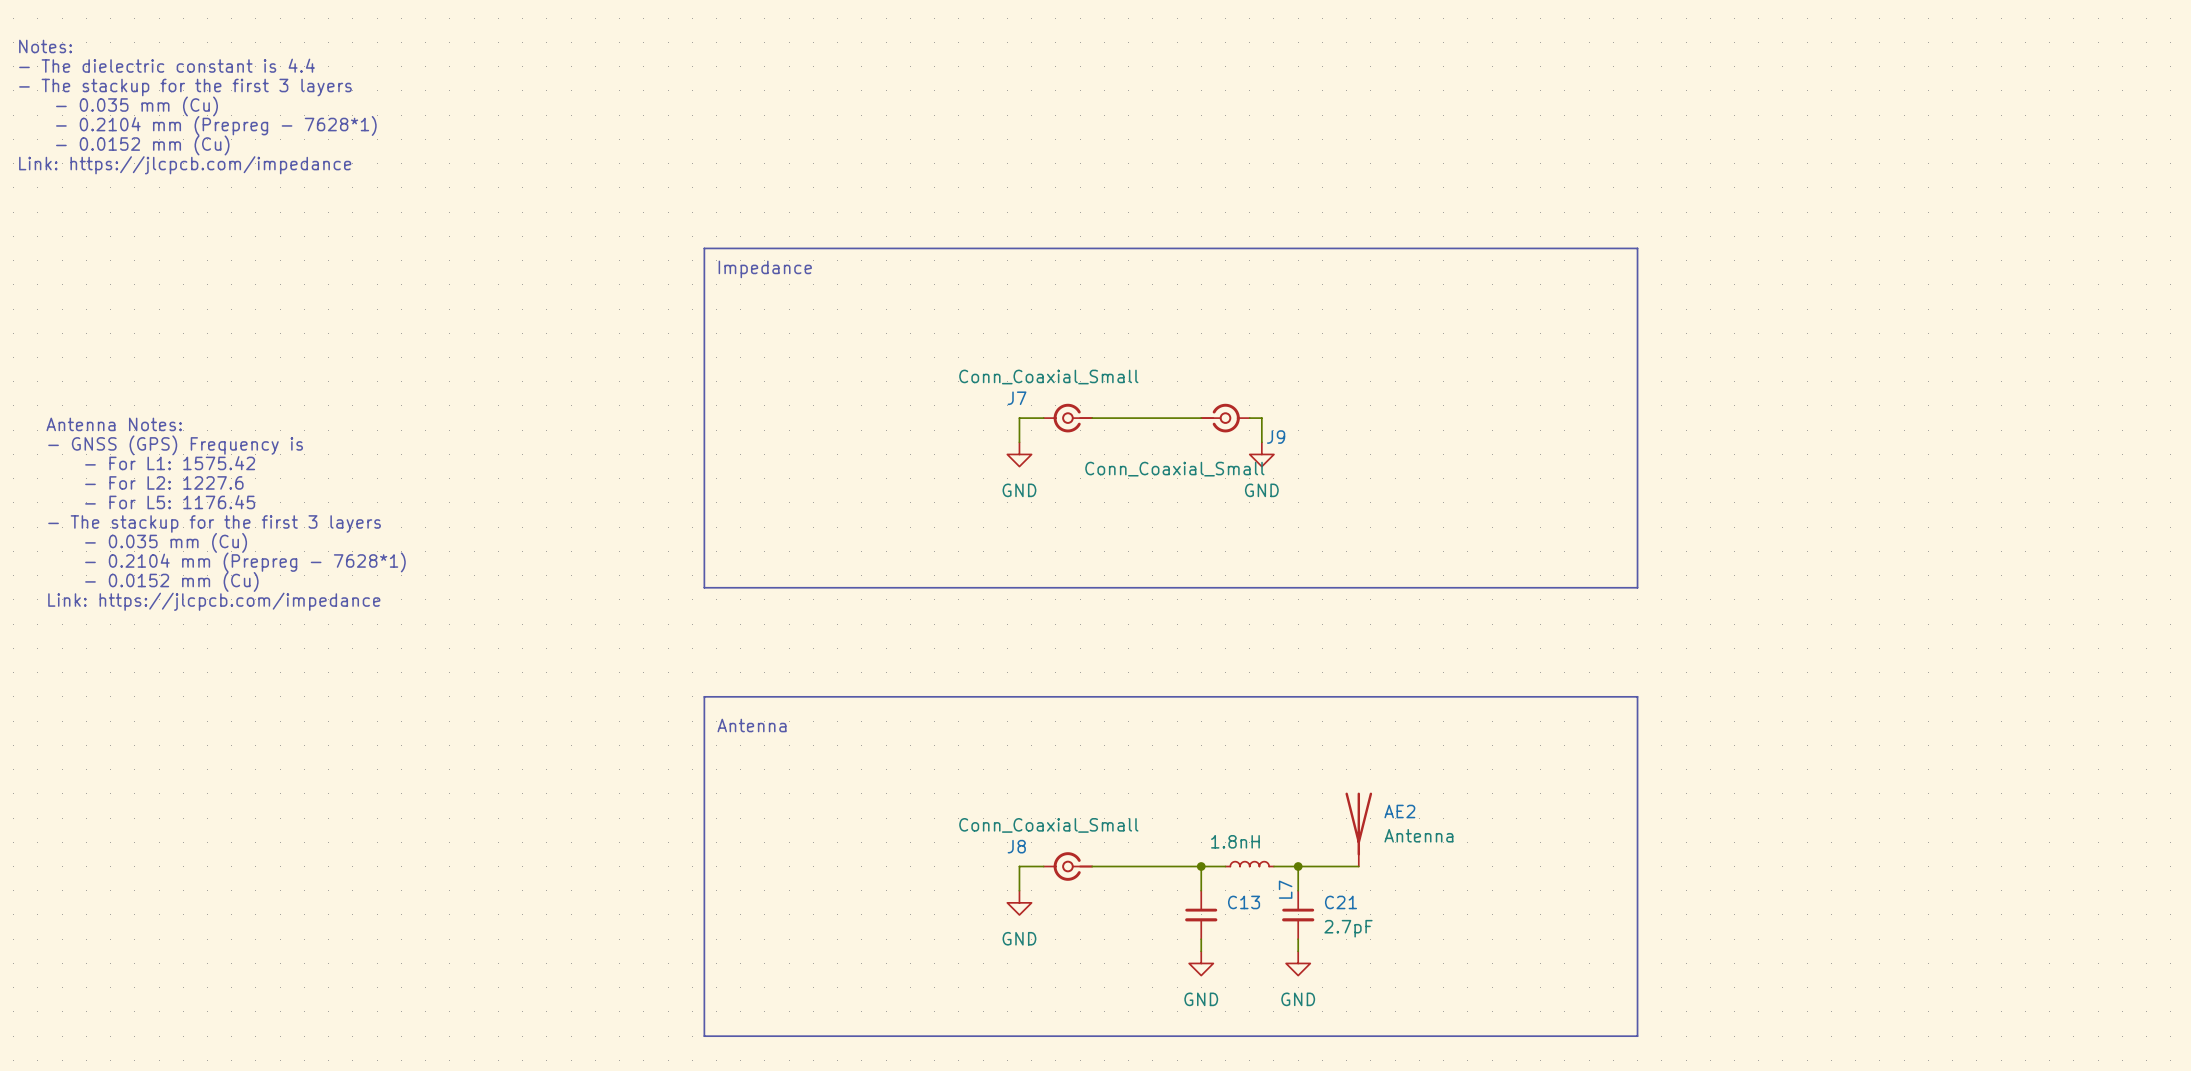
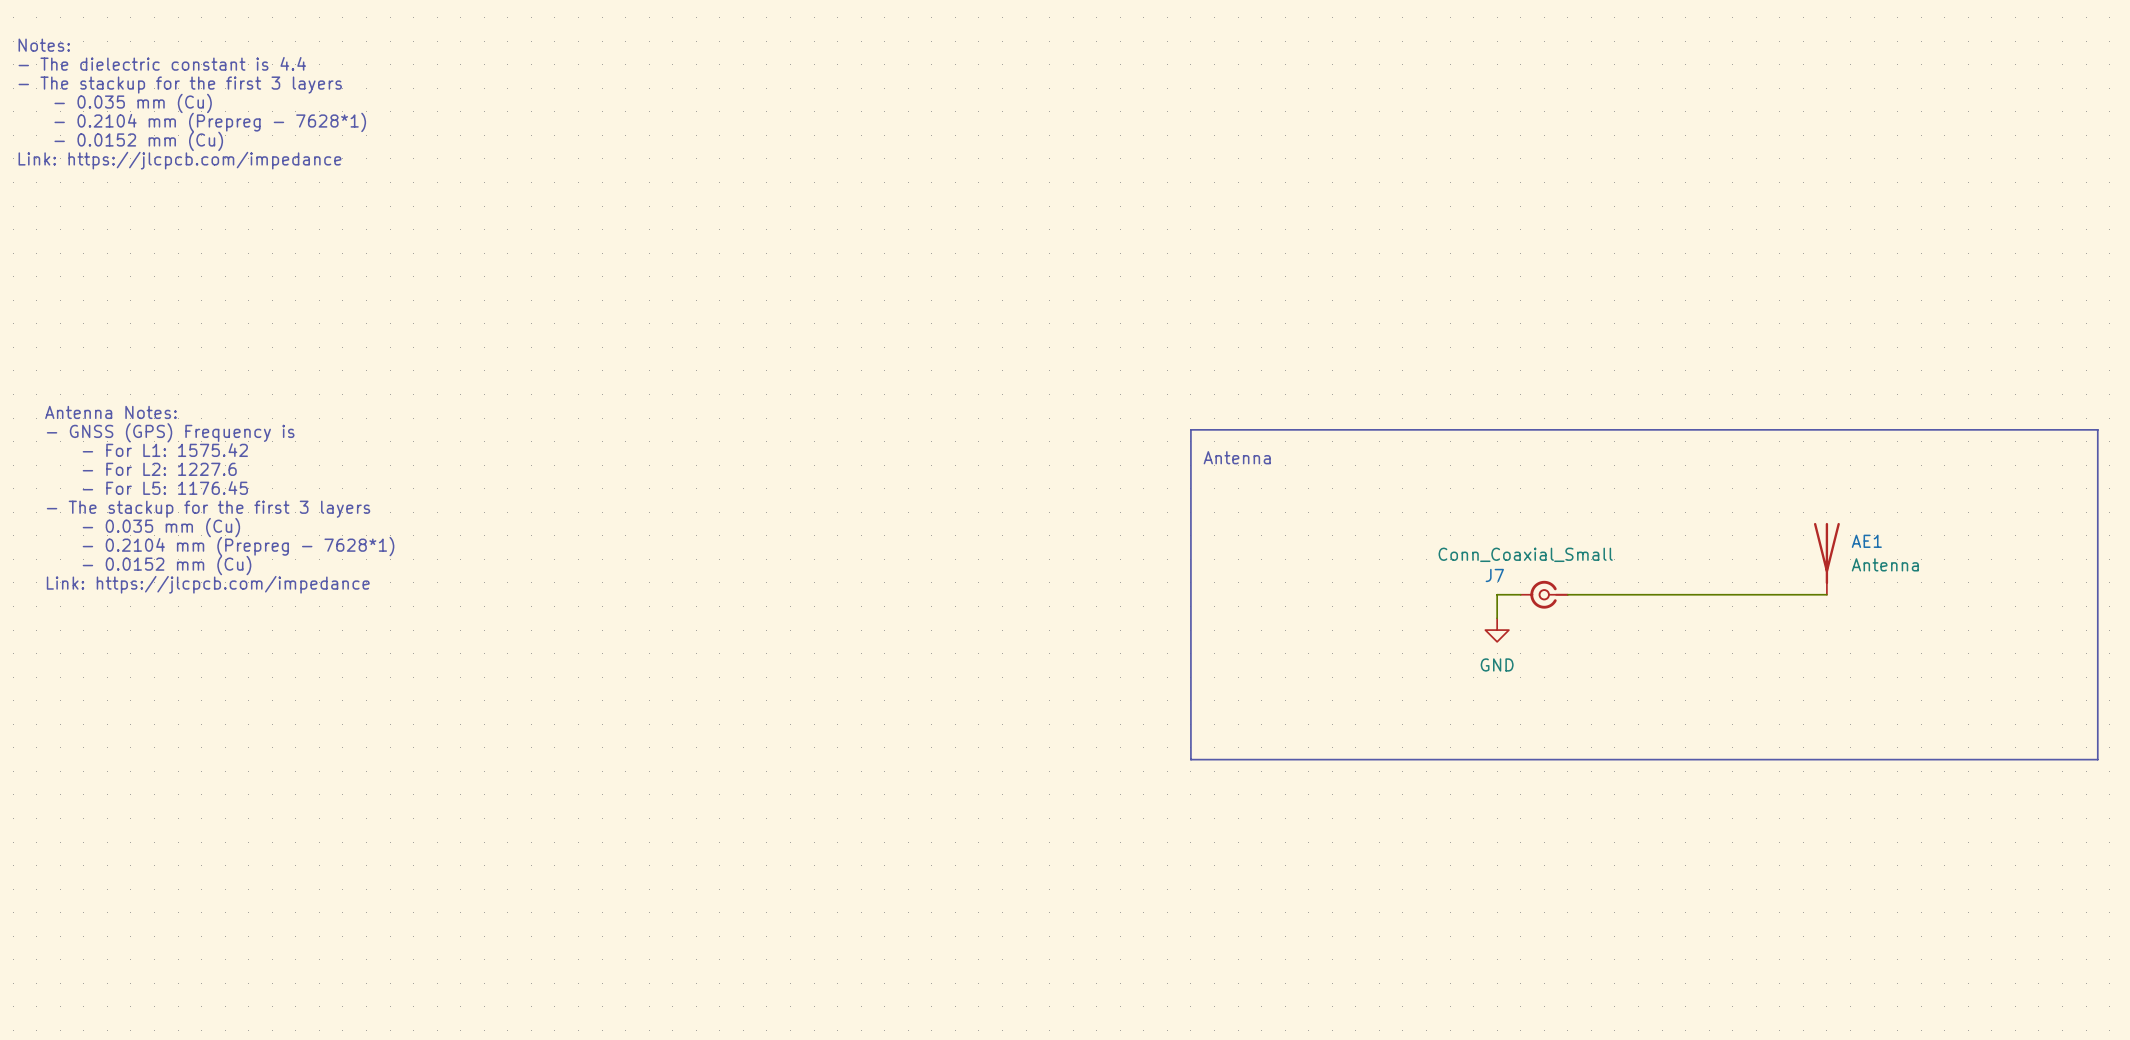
line: (704, 248) (704, 587) (1637, 587) (1637, 248) (704, 248) -> none
text: Impedance (765, 269) -> none
wire: (1043, 418) (1019, 418) (1019, 442) -> none
J7 position: (1067, 418) -> (1544, 594)
wire: (1092, 418) (1201, 418) -> none
J9: Conn_Coaxial_Small (1225, 418) -> none
wire: (1249, 418) (1261, 418) (1261, 442) -> none
line: none -> (1190, 429) (2097, 429) (2097, 759) (1190, 759) (1190, 429)
power symbol: GND (1019, 454) -> none
power symbol: GND (1261, 454) -> none
text: none -> Antenna (1237, 457)
AE1: none -> Antenna (1826, 558)
wire: none -> (1520, 594) (1497, 594) (1497, 618)
wire: none -> (1567, 594) (1826, 594)
power symbol: none -> GND (1497, 630)
line: (704, 696) (1637, 696) (1637, 1036) (704, 1036) (704, 696) -> none
text: Antenna (751, 725) -> none
AE2: Antenna (1358, 829) -> none
L7: 1.8nH (1249, 864) -> none
wire: (1043, 866) (1019, 866) (1019, 890) -> none
J8: Conn_Coaxial_Small (1067, 866) -> none
wire: (1092, 866) (1225, 866) -> none
wire: (1201, 866) (1201, 890) -> none
junction: (1201, 866) -> none
wire: (1273, 866) (1358, 866) -> none
wire: (1298, 866) (1298, 890) -> none
junction: (1298, 866) -> none
power symbol: GND (1019, 902) -> none
C13: (1201, 914) -> none
C21: 2.7pF (1298, 914) -> none
wire: (1201, 939) (1201, 951) -> none
wire: (1298, 939) (1298, 951) -> none
power symbol: GND (1201, 963) -> none
power symbol: GND (1298, 963) -> none

